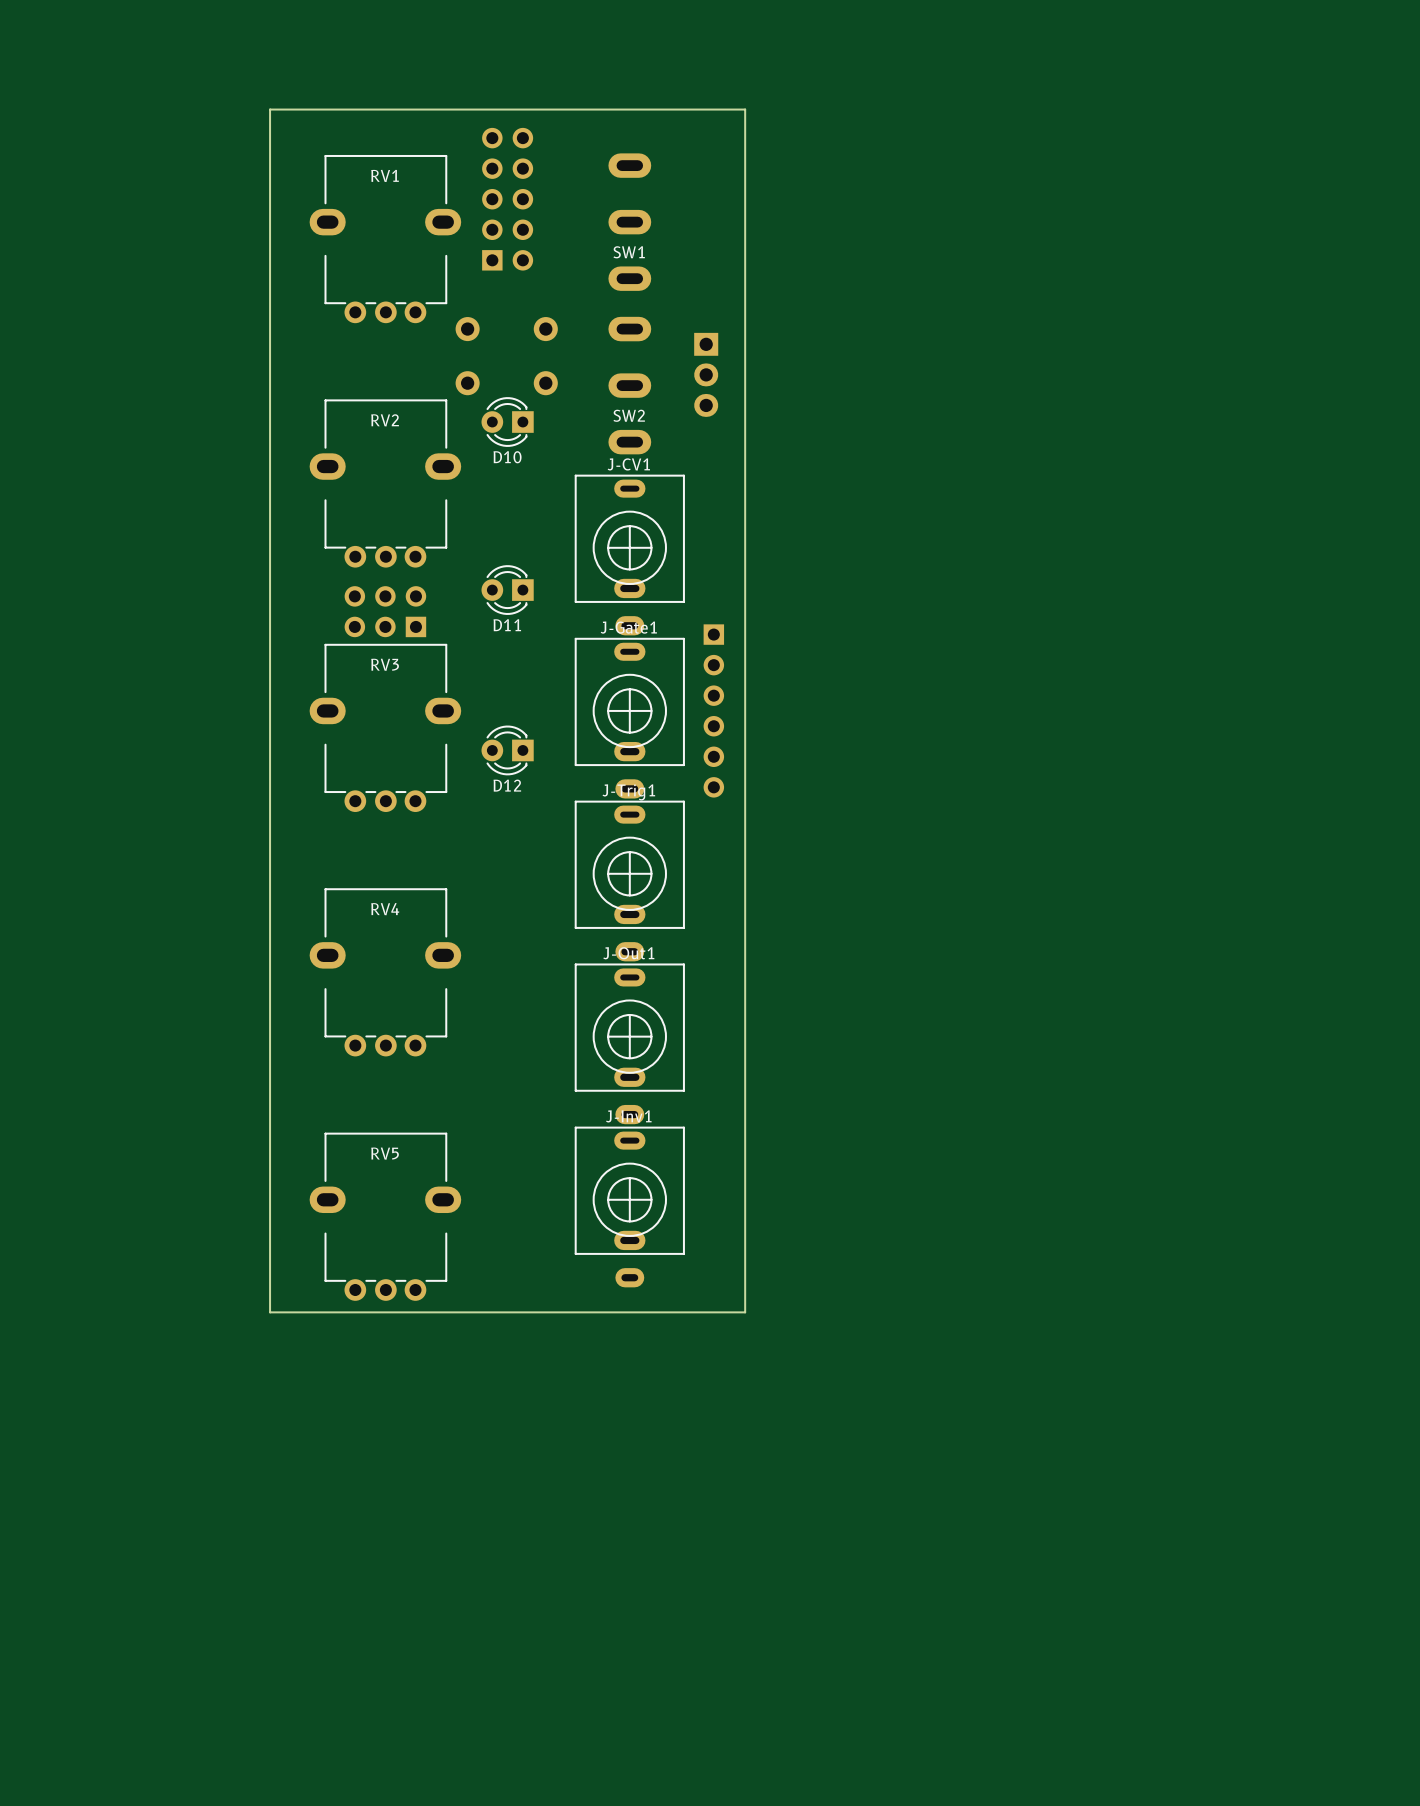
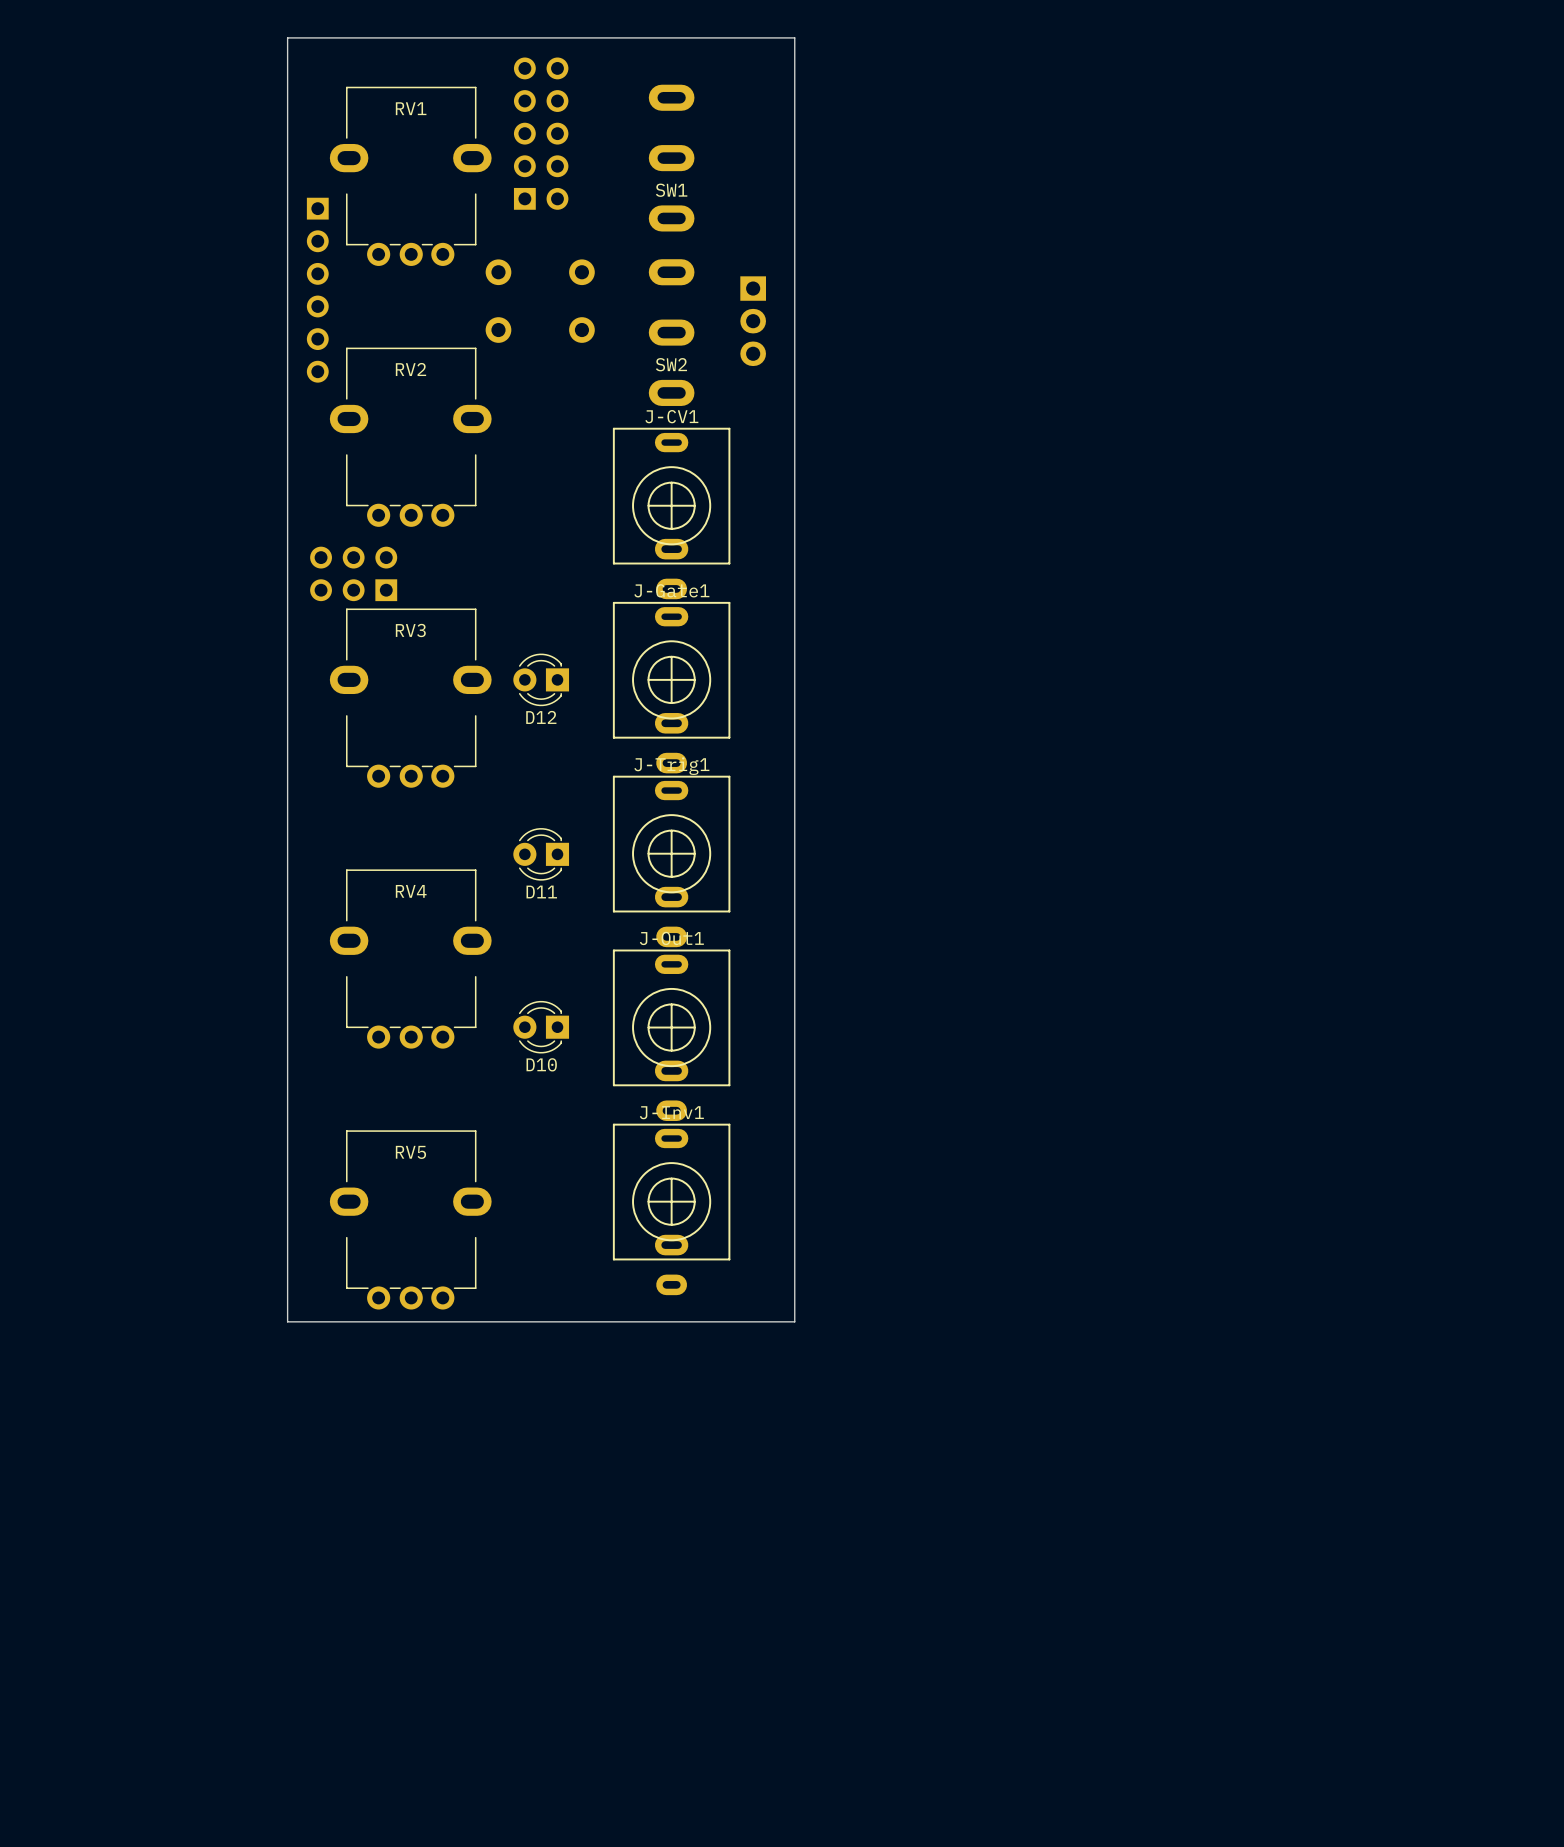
part: none -> (317, 290)
D10 position: (507, 422) -> (541, 1027)
D11 position: (507, 590) -> (541, 854)
part position: (385, 611) -> (353, 573)
part: (713, 710) -> none
D12 position: (507, 750) -> (541, 679)

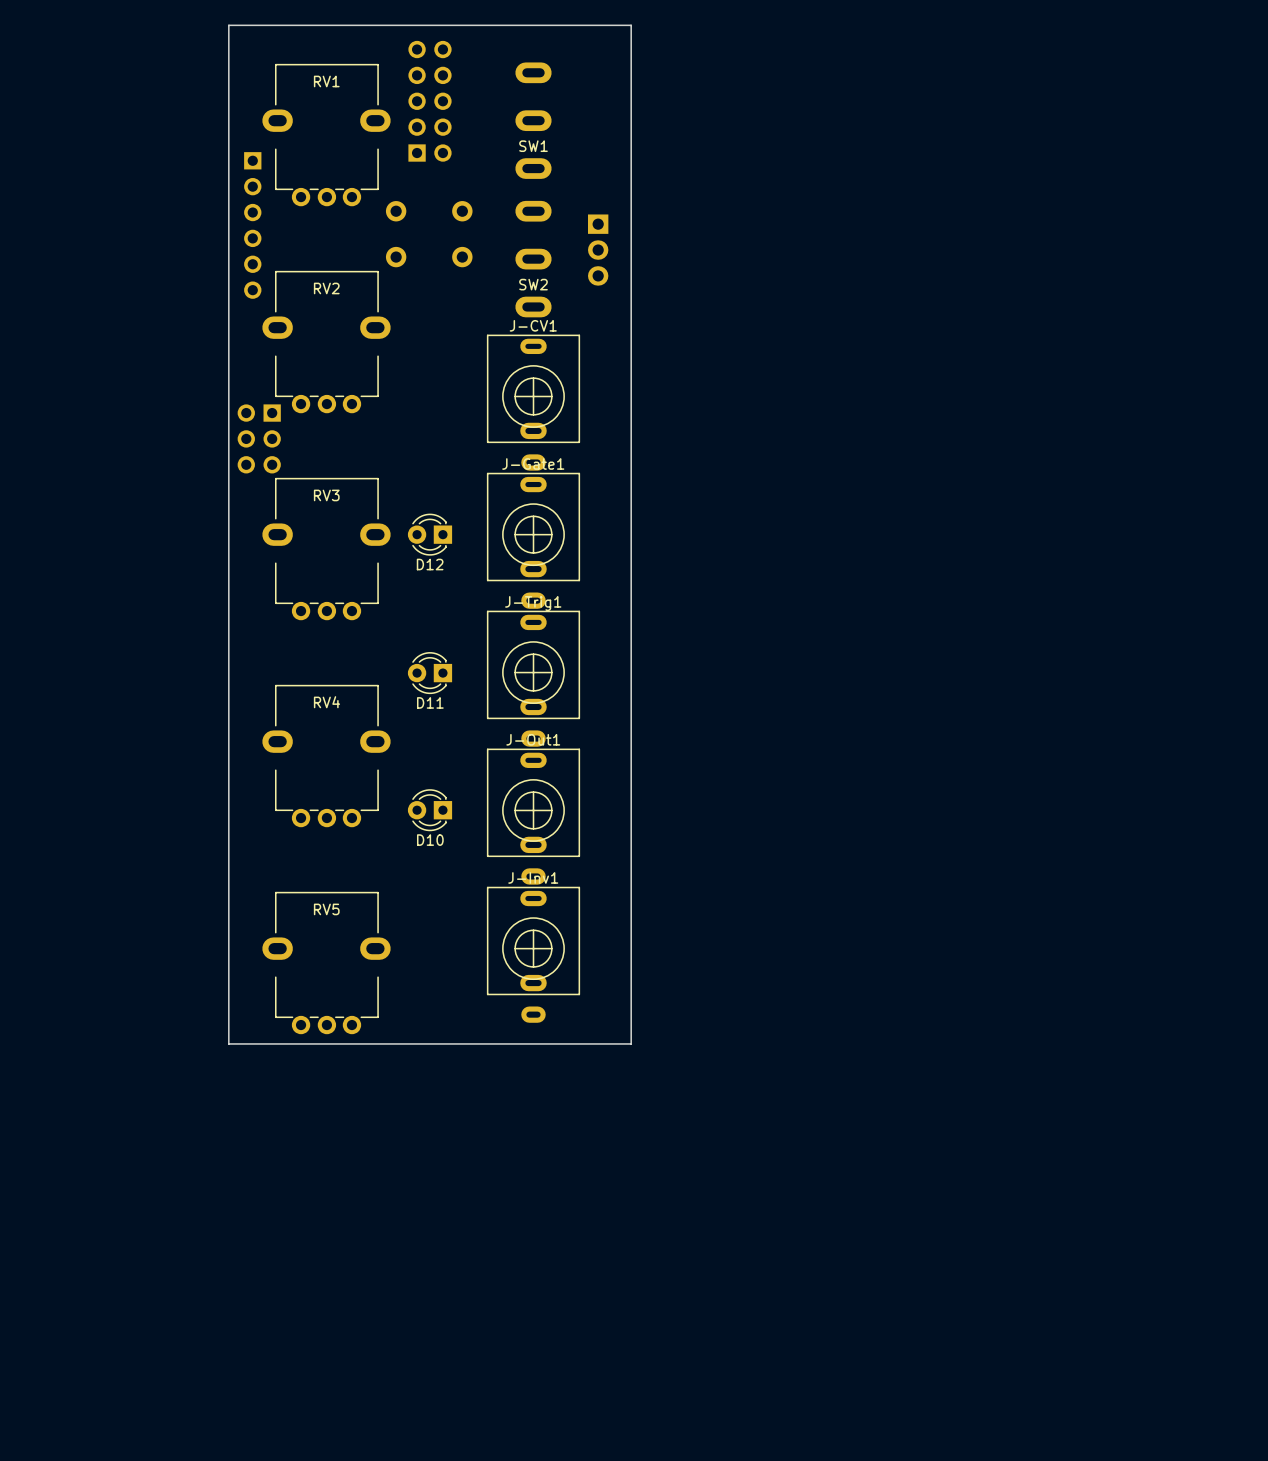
part rotation: 0° (353, 573) -> 90° counterclockwise (259, 438)

